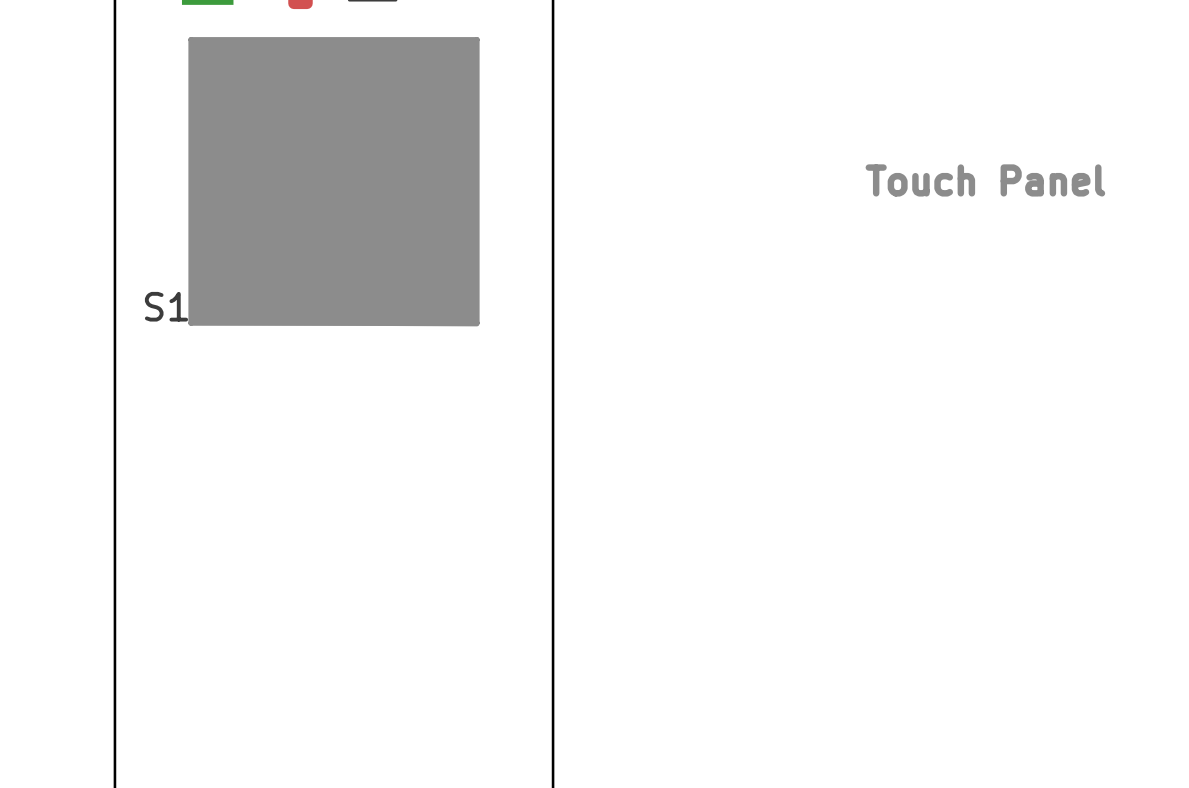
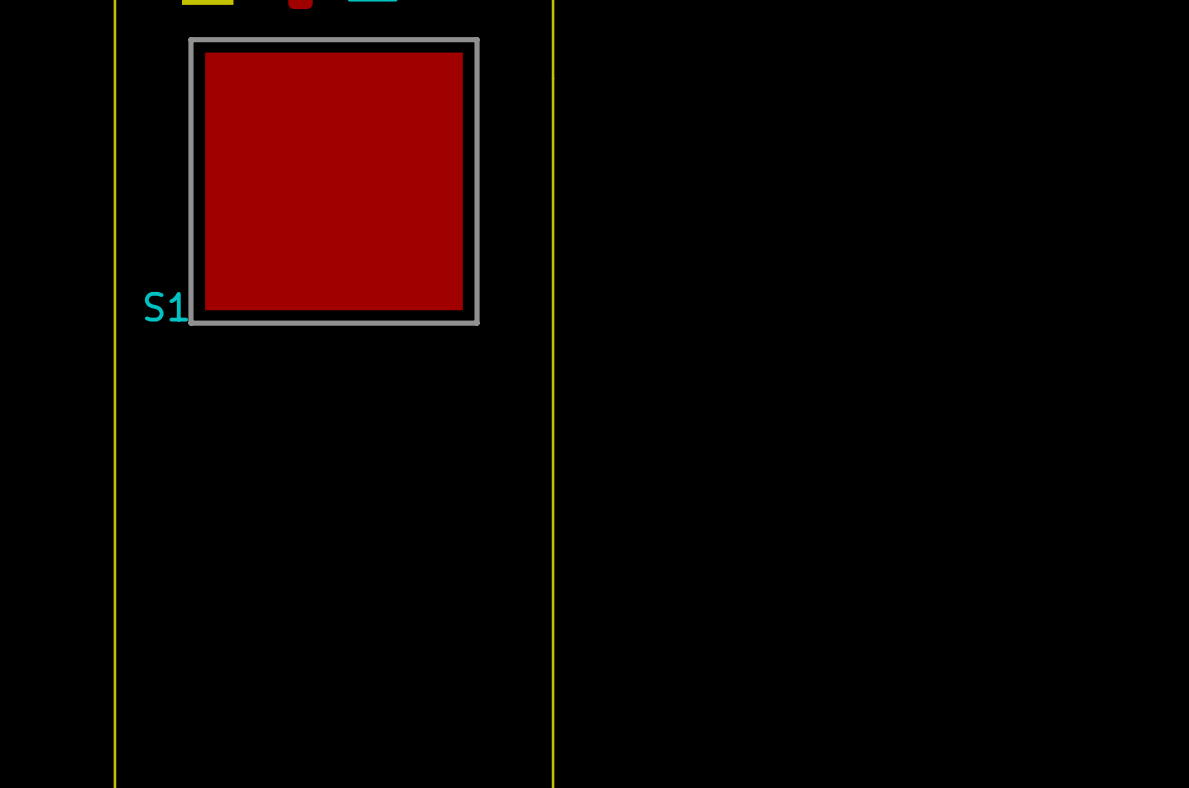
drawing: [189, 37, 479, 327] -> none
text: Touch Panel (985, 180) -> none

